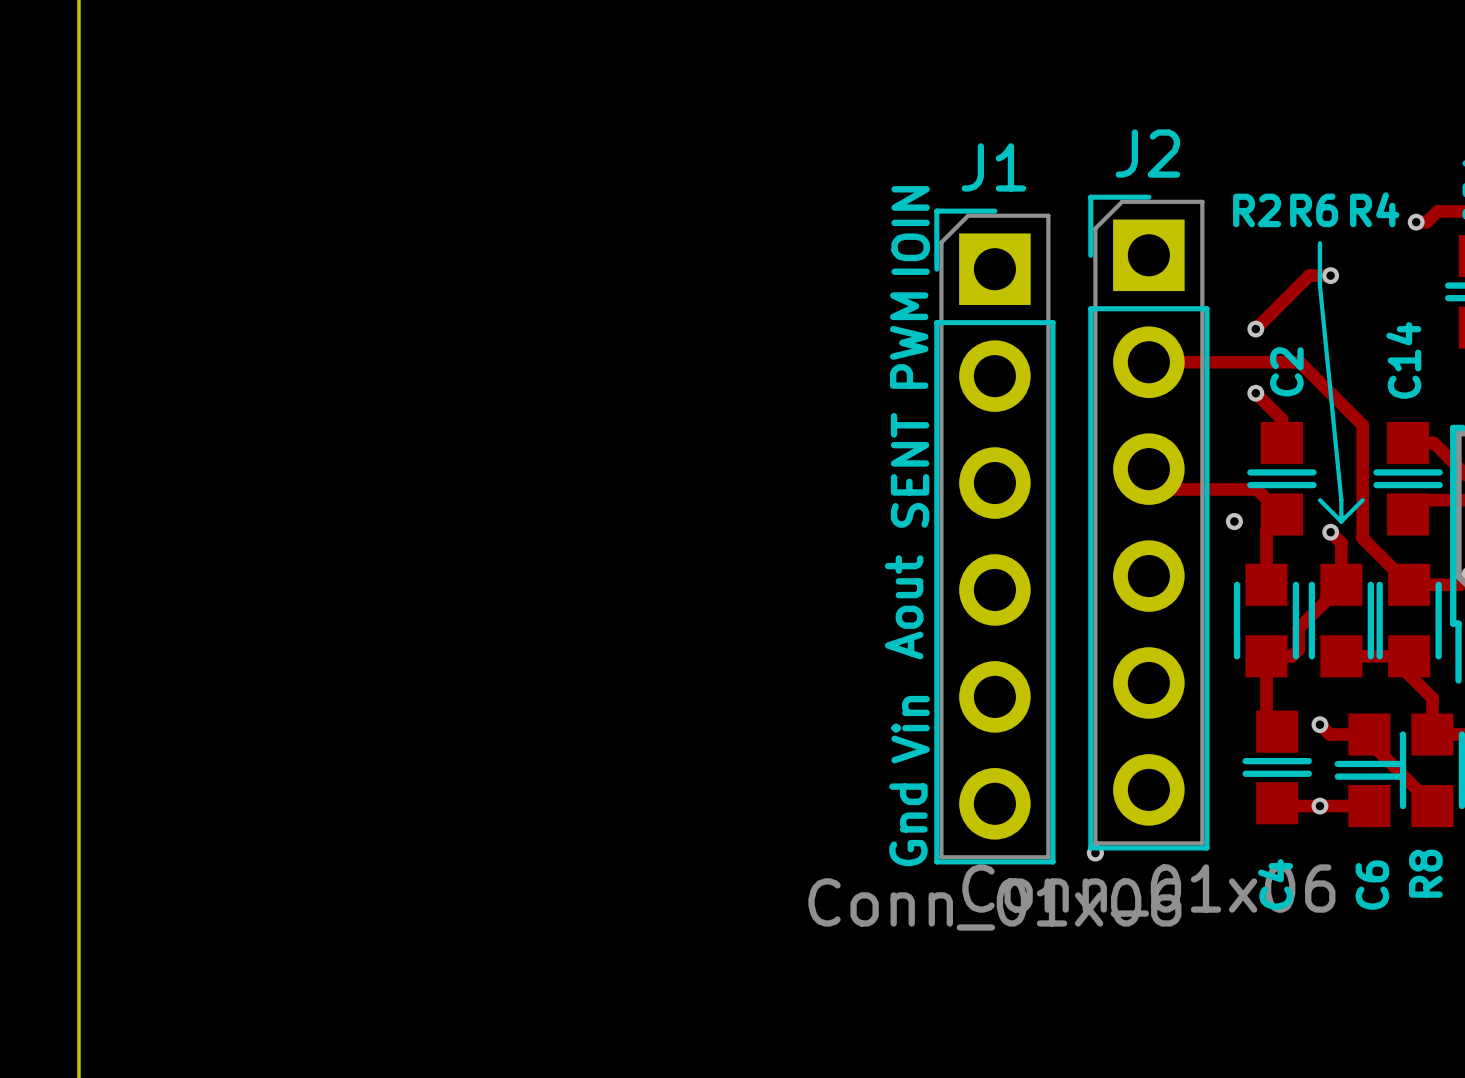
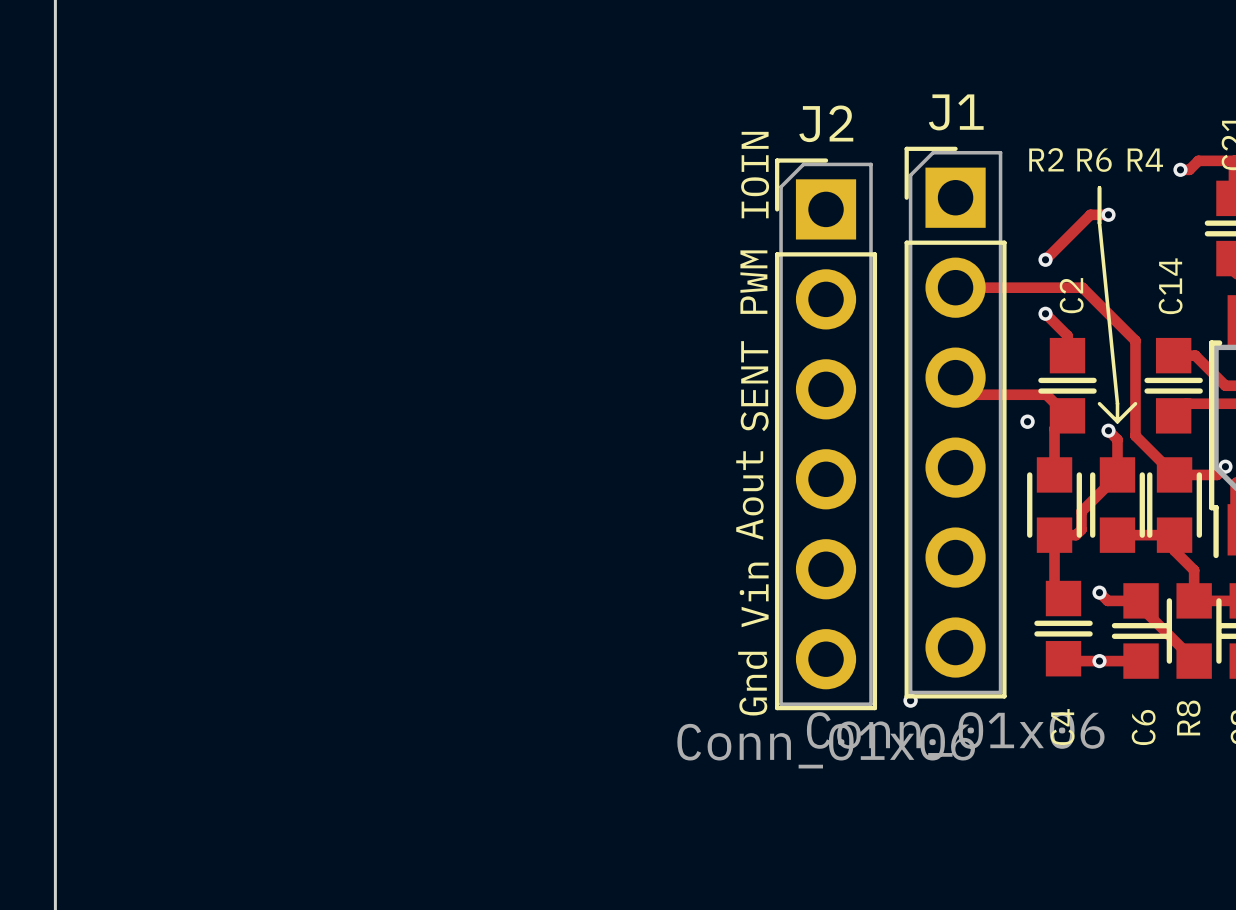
J2 name: J2 (1147, 153) -> J1 (956, 112)
J1 name: J1 (993, 167) -> J2 (826, 123)

